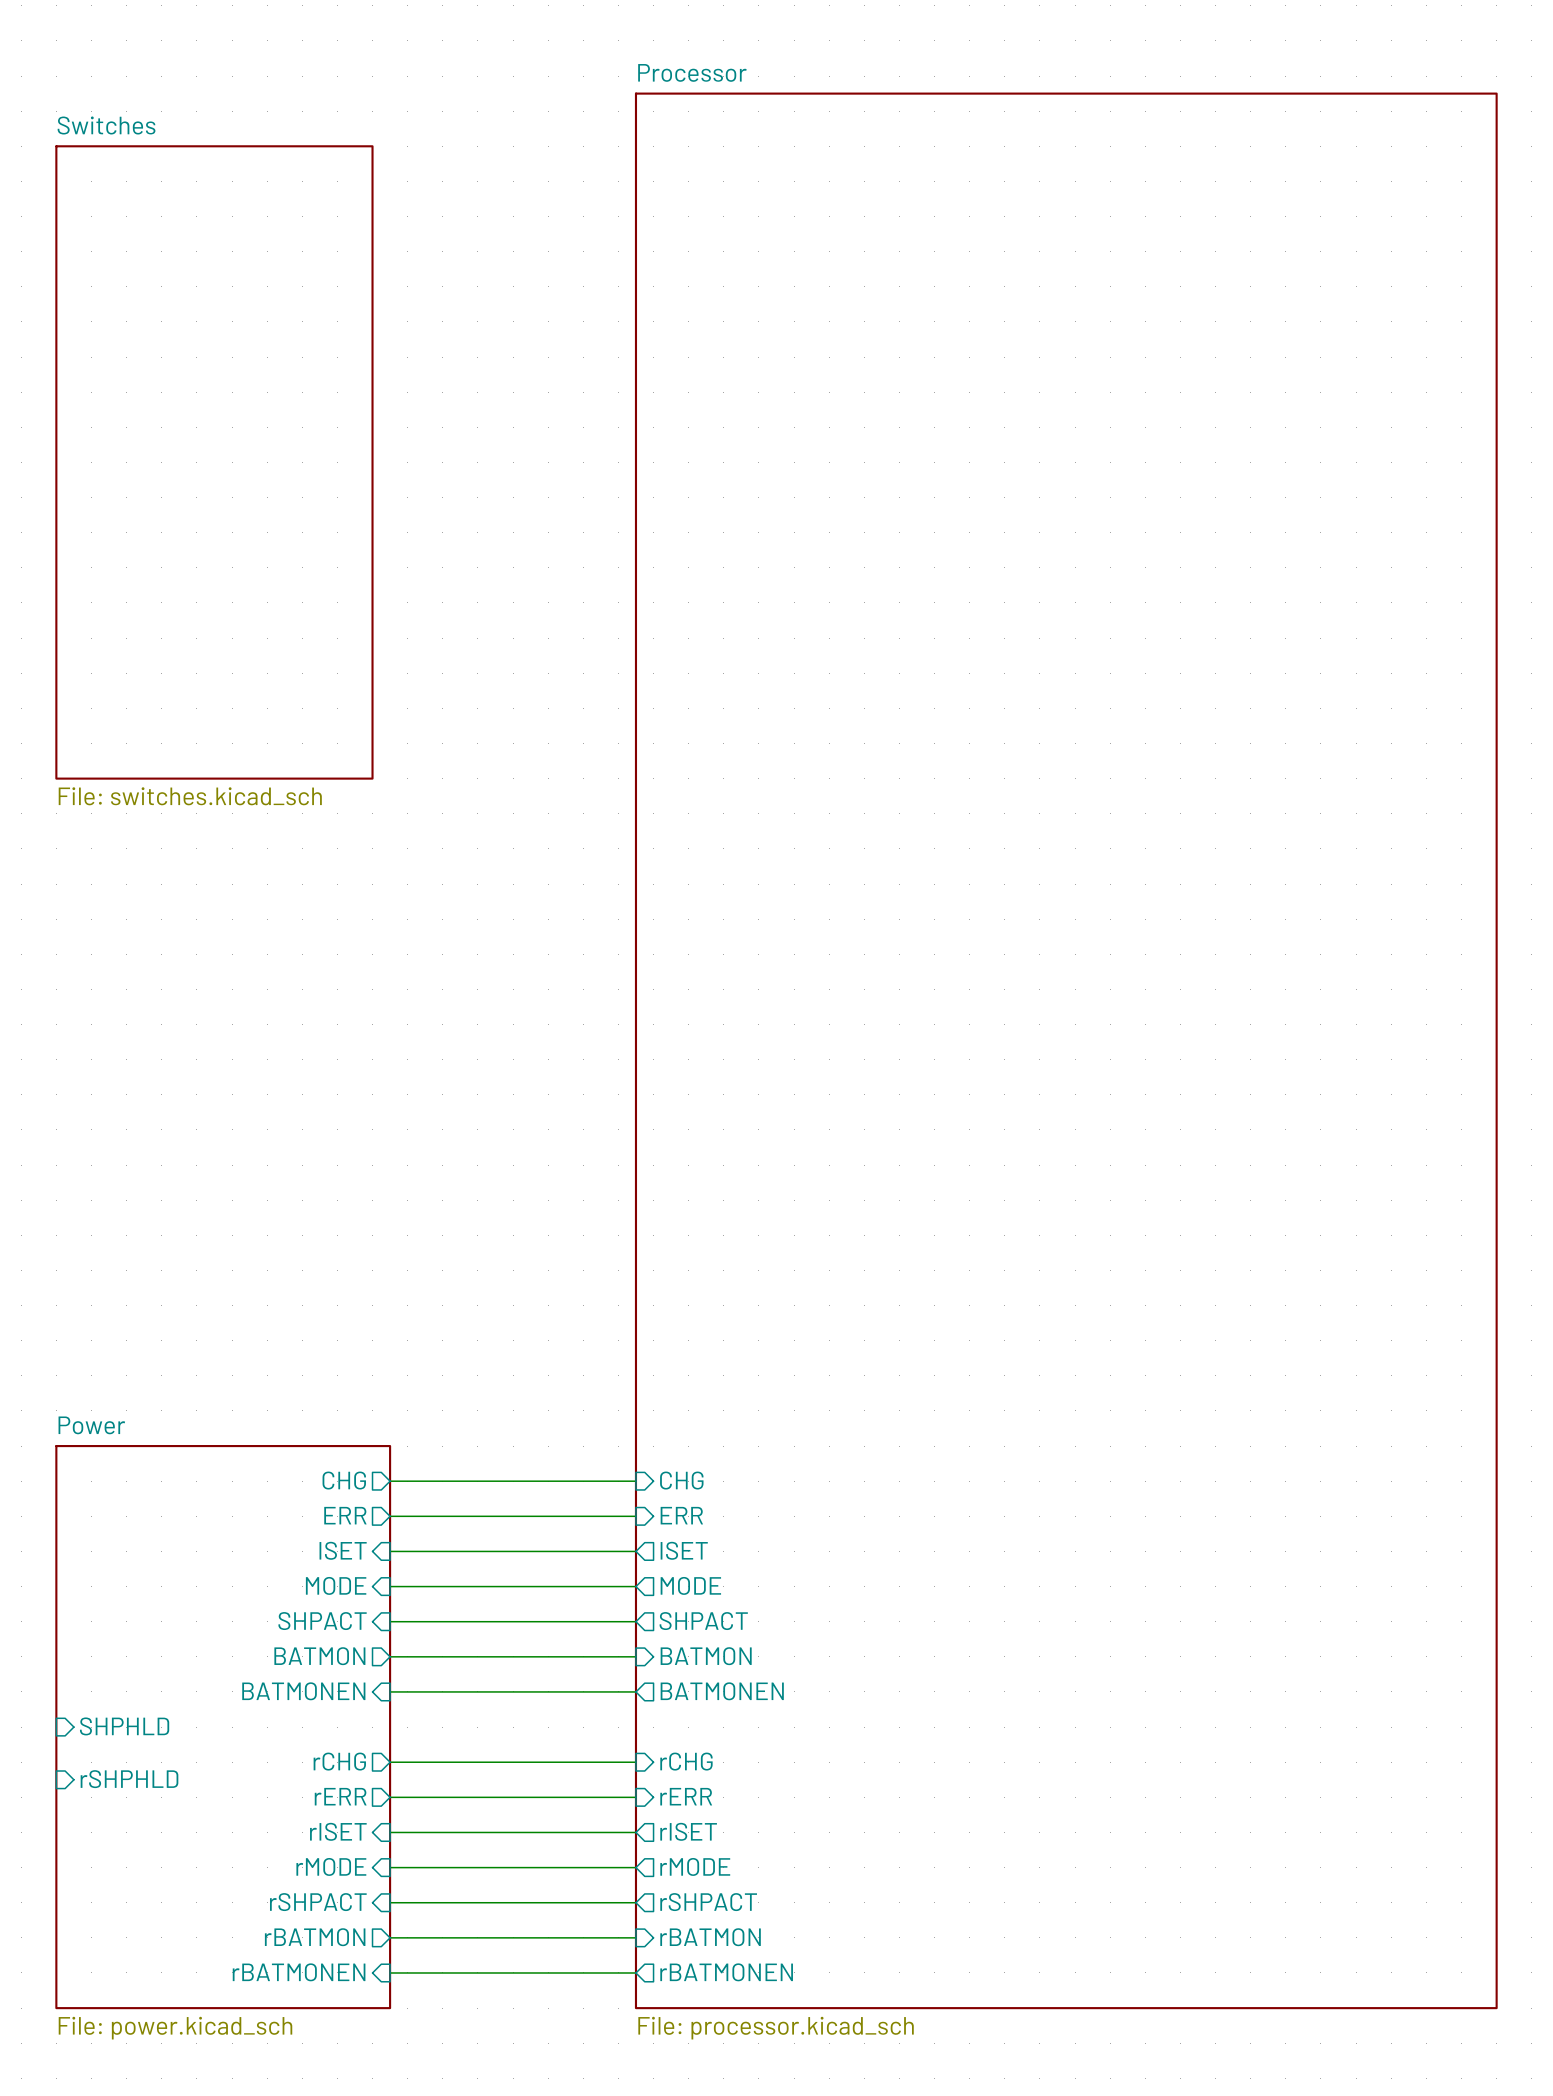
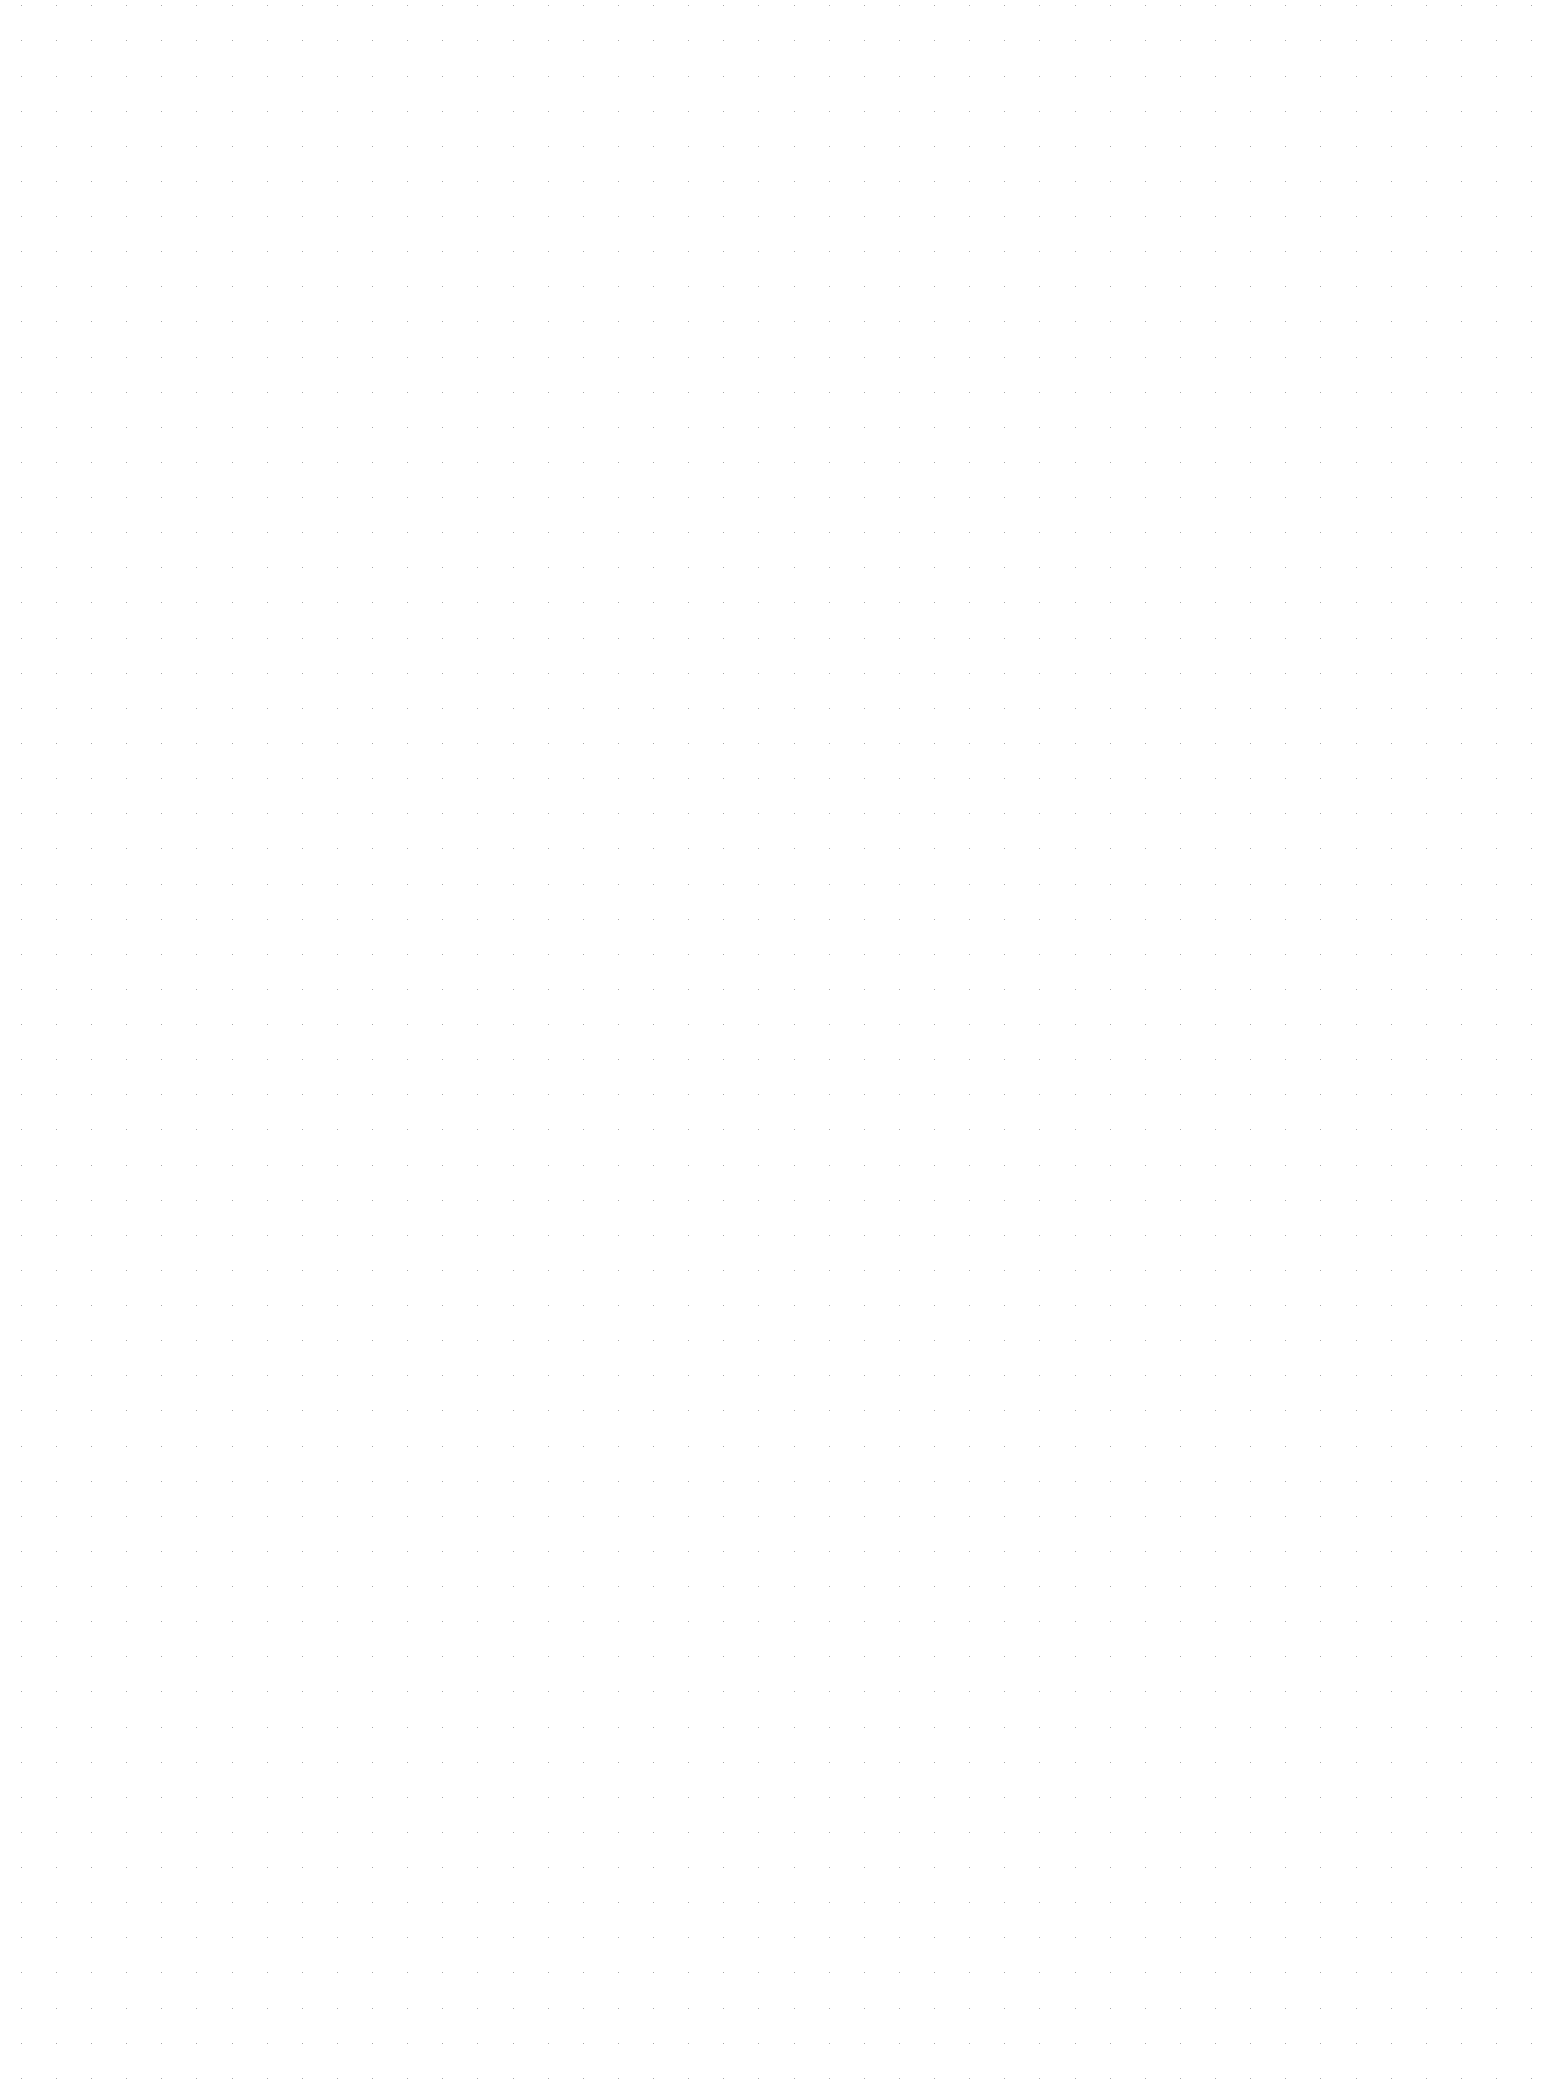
sheet Switches: File: switches.kicad_sch (214, 462) -> none
sheet Processor: File: processor.kicad_sch (1066, 1050) -> none
sheet pin: CHG (344, 1480) -> none
sheet pin: CHG (681, 1480) -> none
wire: (390, 1481) (635, 1481) -> none
sheet pin: ERR (345, 1515) -> none
sheet pin: ERR (681, 1515) -> none
wire: (390, 1516) (635, 1516) -> none
sheet pin: ISET (343, 1550) -> none
sheet pin: ISET (684, 1550) -> none
wire: (390, 1551) (635, 1551) -> none
sheet pin: MODE (336, 1585) -> none
sheet pin: MODE (690, 1585) -> none
wire: (390, 1586) (635, 1586) -> none
sheet pin: SHPACT (322, 1621) -> none
wire: (390, 1621) (635, 1621) -> none
sheet pin: SHPACT (703, 1621) -> none
sheet pin: BATMON (319, 1656) -> none
wire: (390, 1656) (635, 1656) -> none
sheet pin: BATMON (706, 1656) -> none
sheet pin: BATMONEN (303, 1691) -> none
wire: (390, 1691) (635, 1691) -> none
sheet pin: BATMONEN (722, 1691) -> none
sheet pin: SHPHLD (124, 1726) -> none
sheet Power: File: power.kicad_sch (223, 1727) -> none
sheet pin: rCHG (339, 1761) -> none
sheet pin: rCHG (686, 1761) -> none
wire: (390, 1762) (635, 1762) -> none
sheet pin: rSHPHLD (129, 1779) -> none
sheet pin: rERR (340, 1796) -> none
sheet pin: rERR (686, 1796) -> none
wire: (390, 1797) (635, 1797) -> none
sheet pin: rISET (338, 1831) -> none
sheet pin: rISET (688, 1831) -> none
wire: (390, 1832) (635, 1832) -> none
sheet pin: rMODE (331, 1866) -> none
sheet pin: rMODE (695, 1866) -> none
wire: (390, 1867) (635, 1867) -> none
sheet pin: rSHPACT (318, 1902) -> none
wire: (390, 1902) (635, 1902) -> none
sheet pin: rSHPACT (708, 1902) -> none
sheet pin: rBATMON (315, 1937) -> none
wire: (390, 1937) (635, 1937) -> none
sheet pin: rBATMON (710, 1937) -> none
sheet pin: rBATMONEN (299, 1972) -> none
wire: (390, 1972) (635, 1972) -> none
sheet pin: rBATMONEN (726, 1972) -> none

